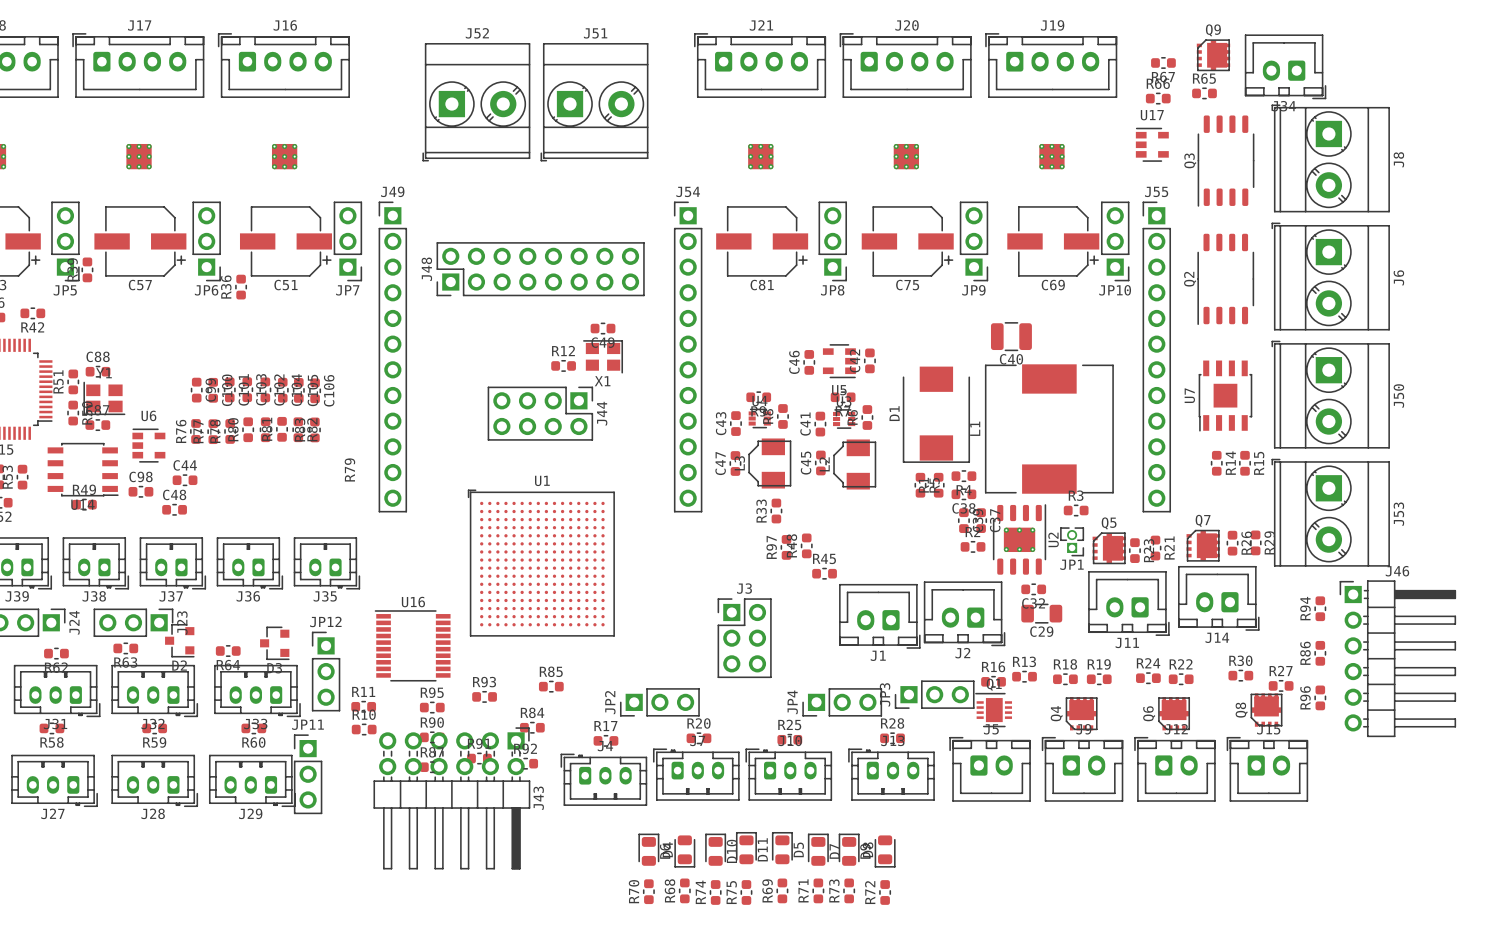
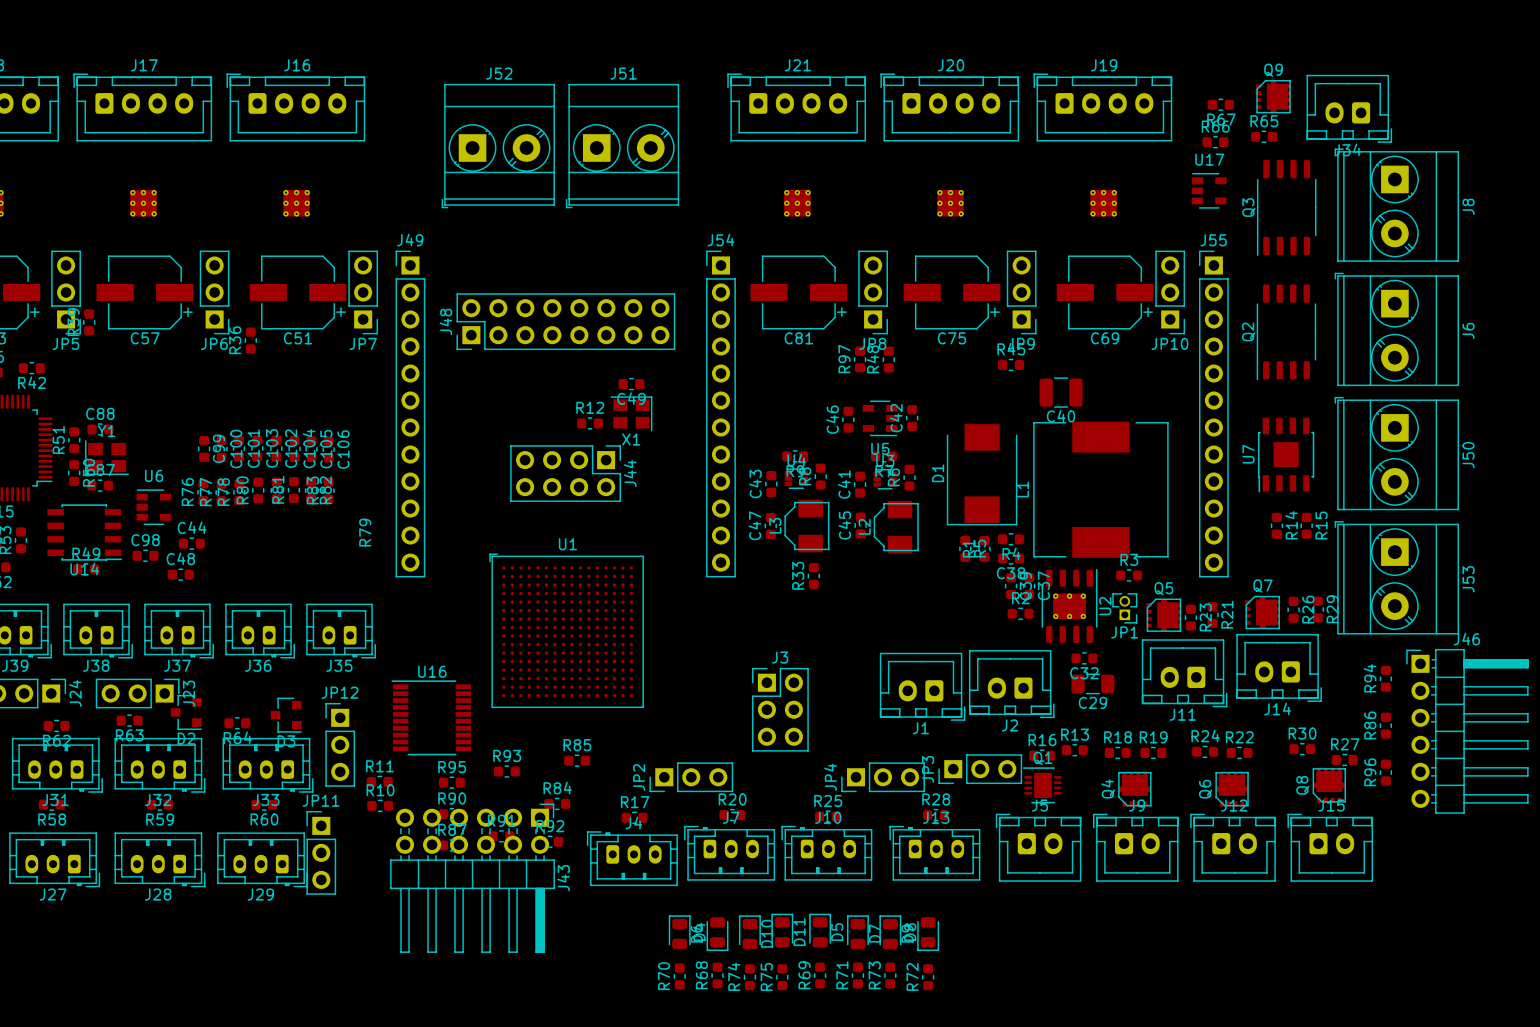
R48 position: (806, 545) -> (888, 359)
R97 position: (786, 547) -> (860, 359)
R45 position: (824, 573) -> (1011, 364)

